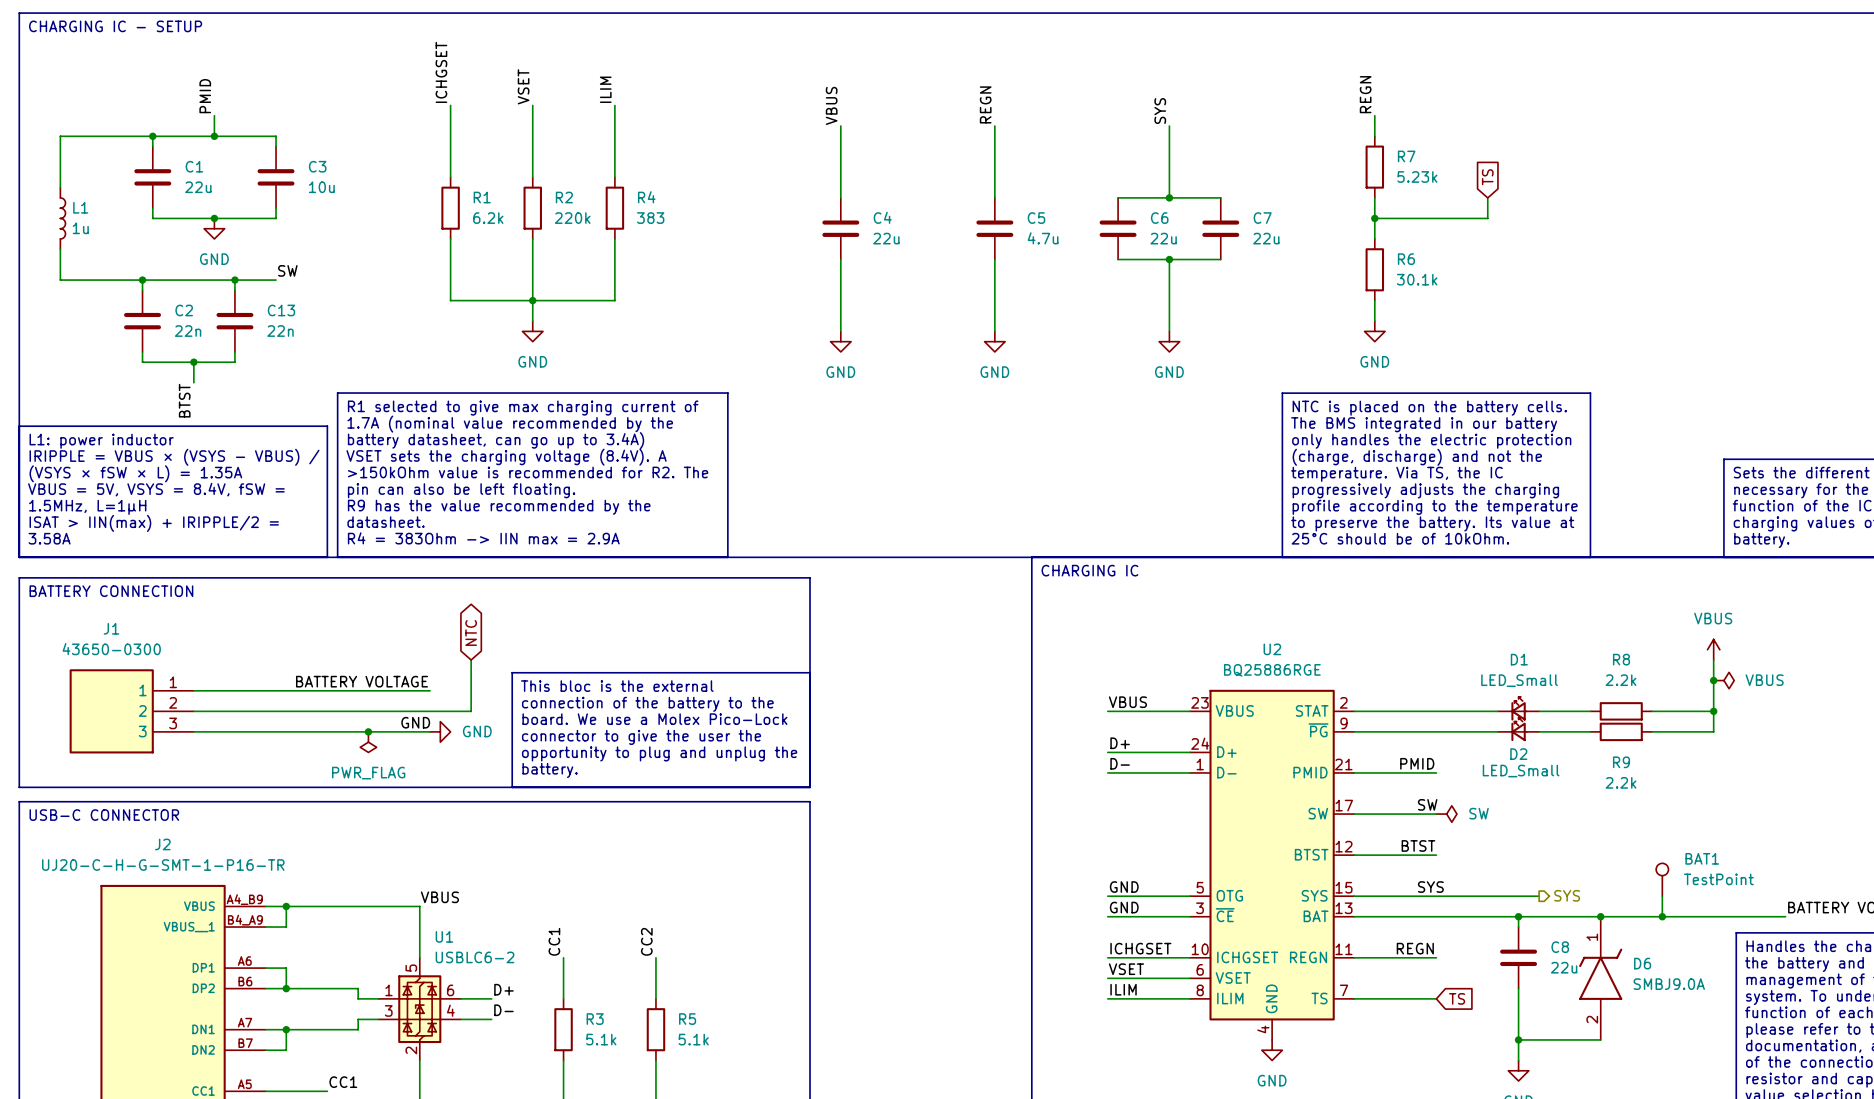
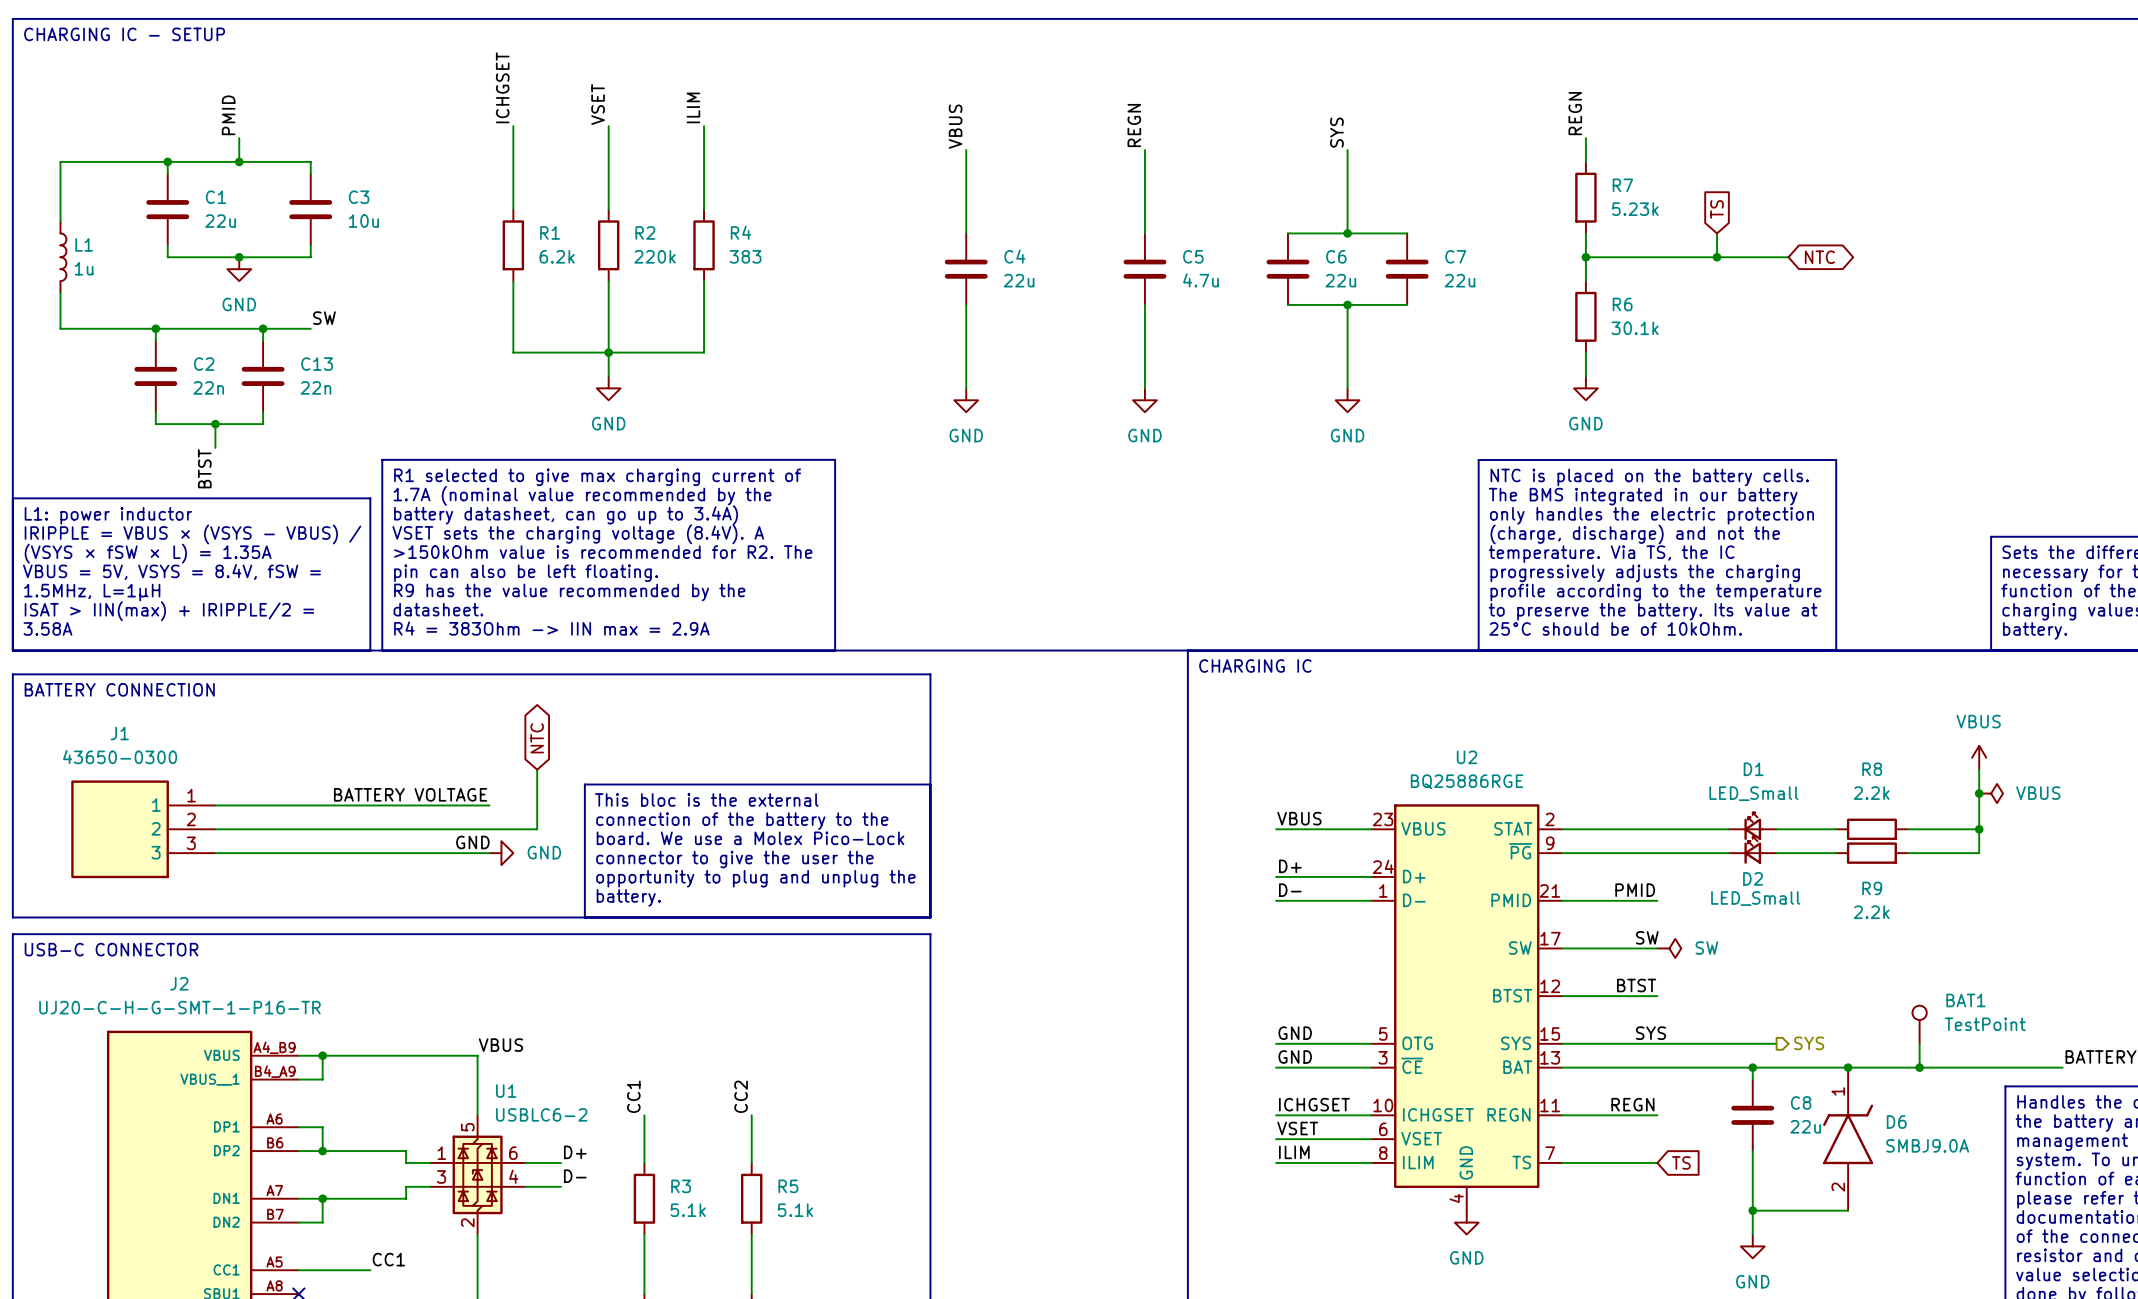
wire: none -> (1717, 257) (1788, 257)
junction: none -> (1717, 257)
global label: none -> NTC (1819, 257)
junction: (368, 731) -> none
power symbol: PWR_FLAG (368, 742) -> none

